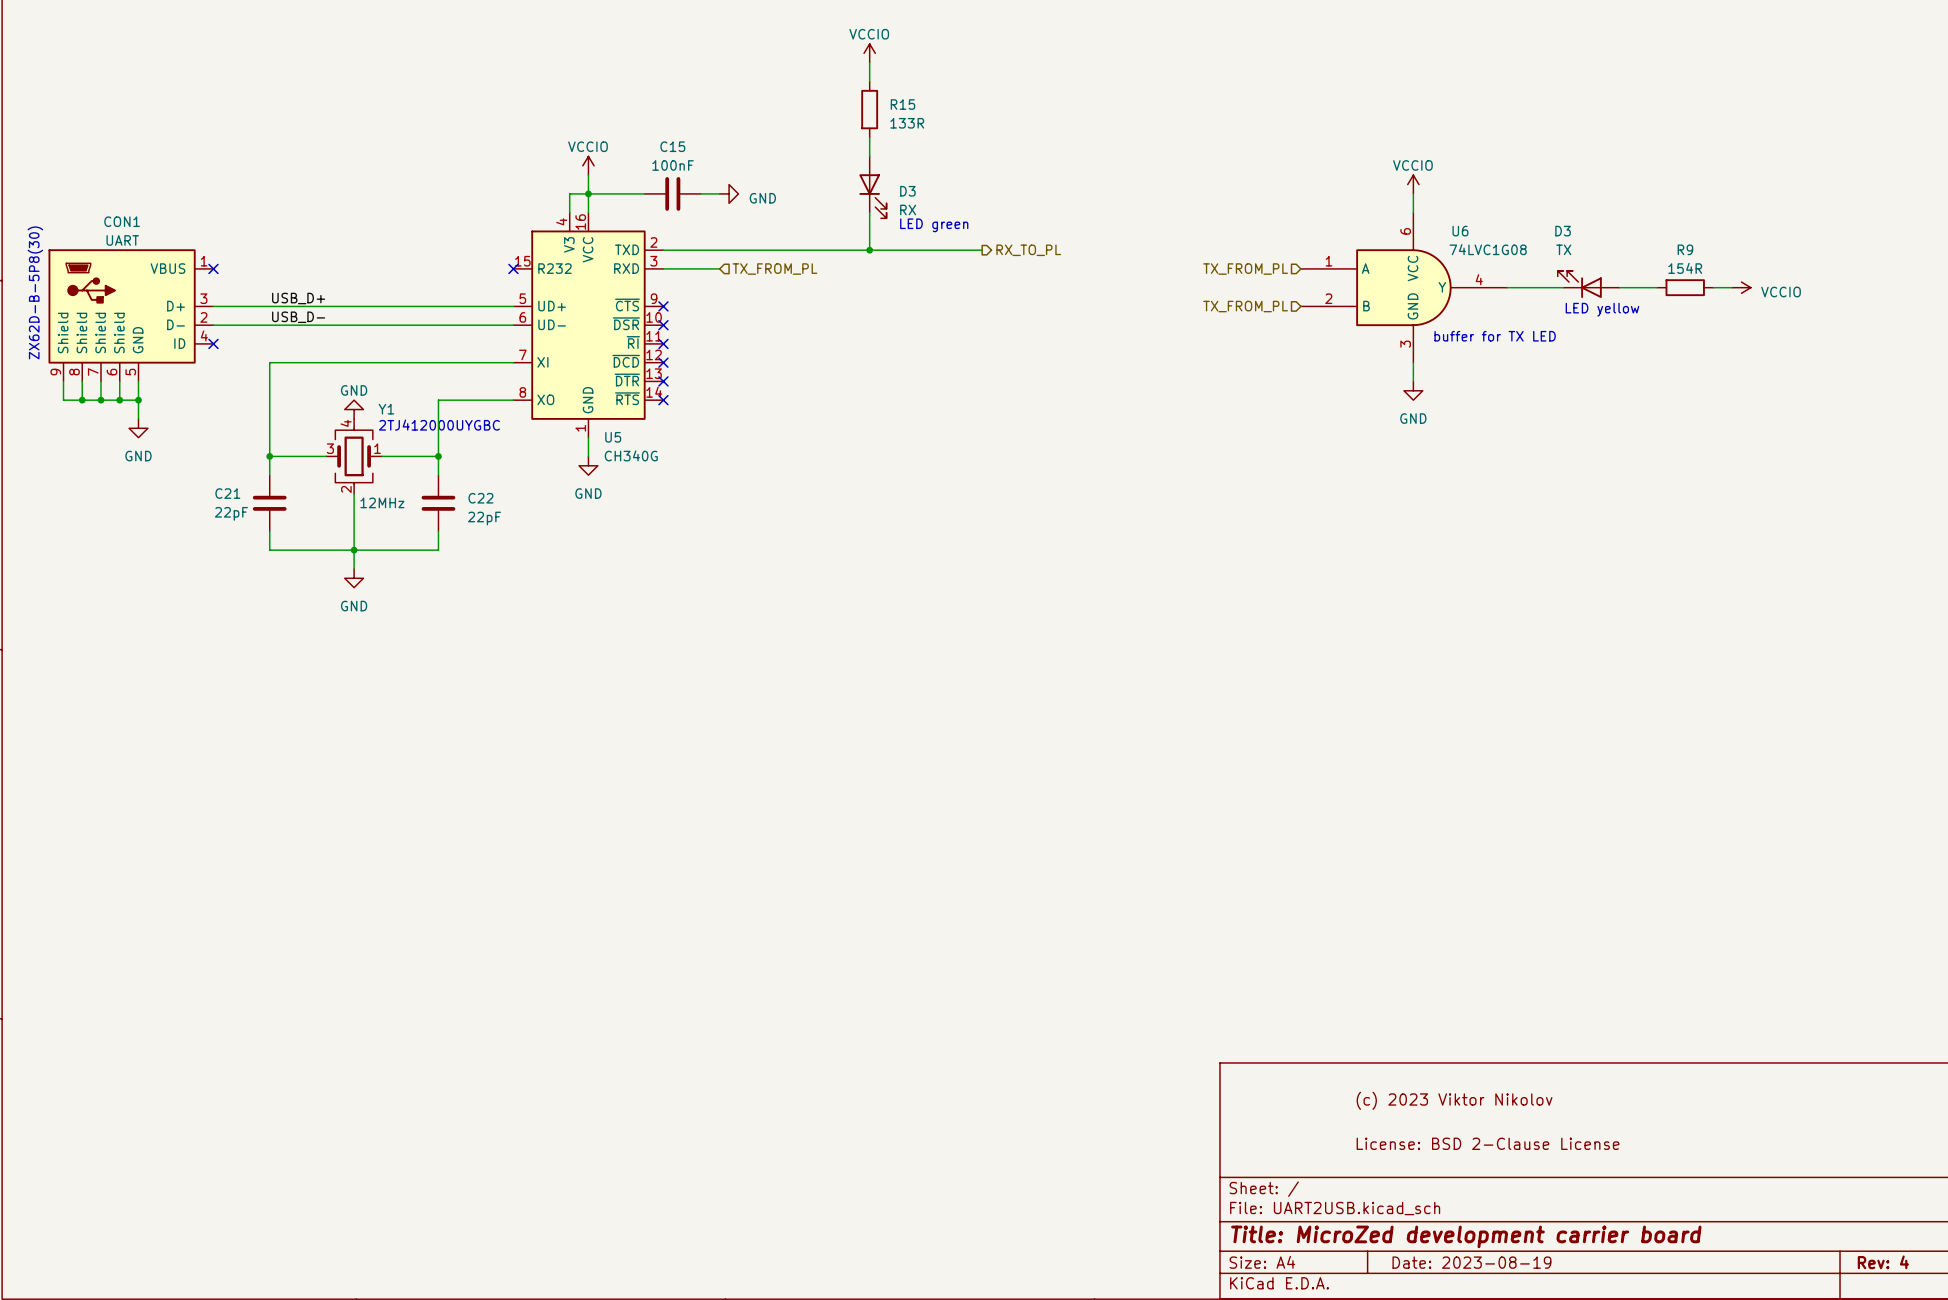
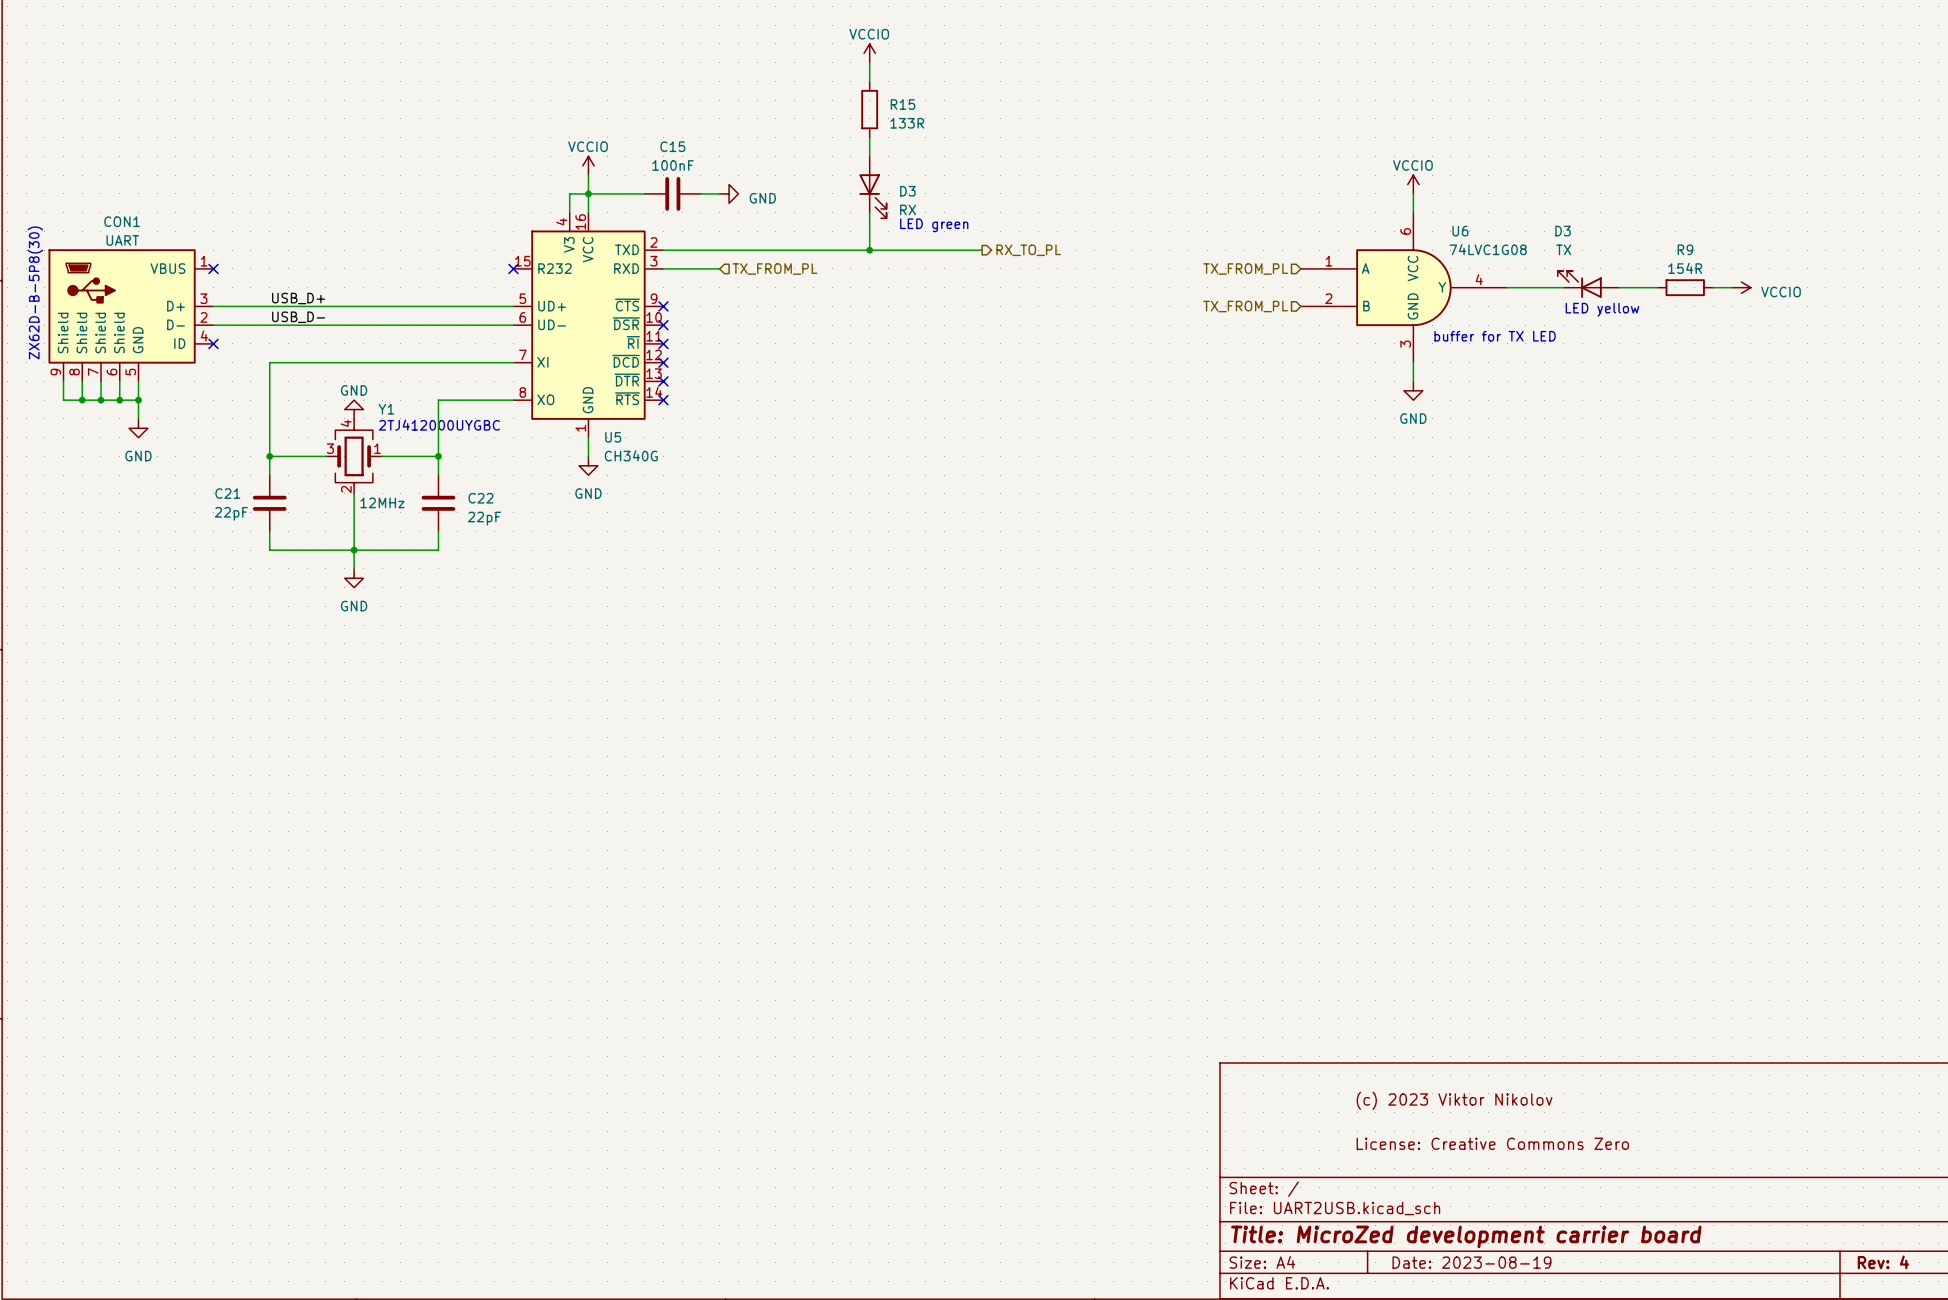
title block: License: BSD 2-Clause License (1488, 1143) -> License: Creative Commons Zero (1492, 1143)

